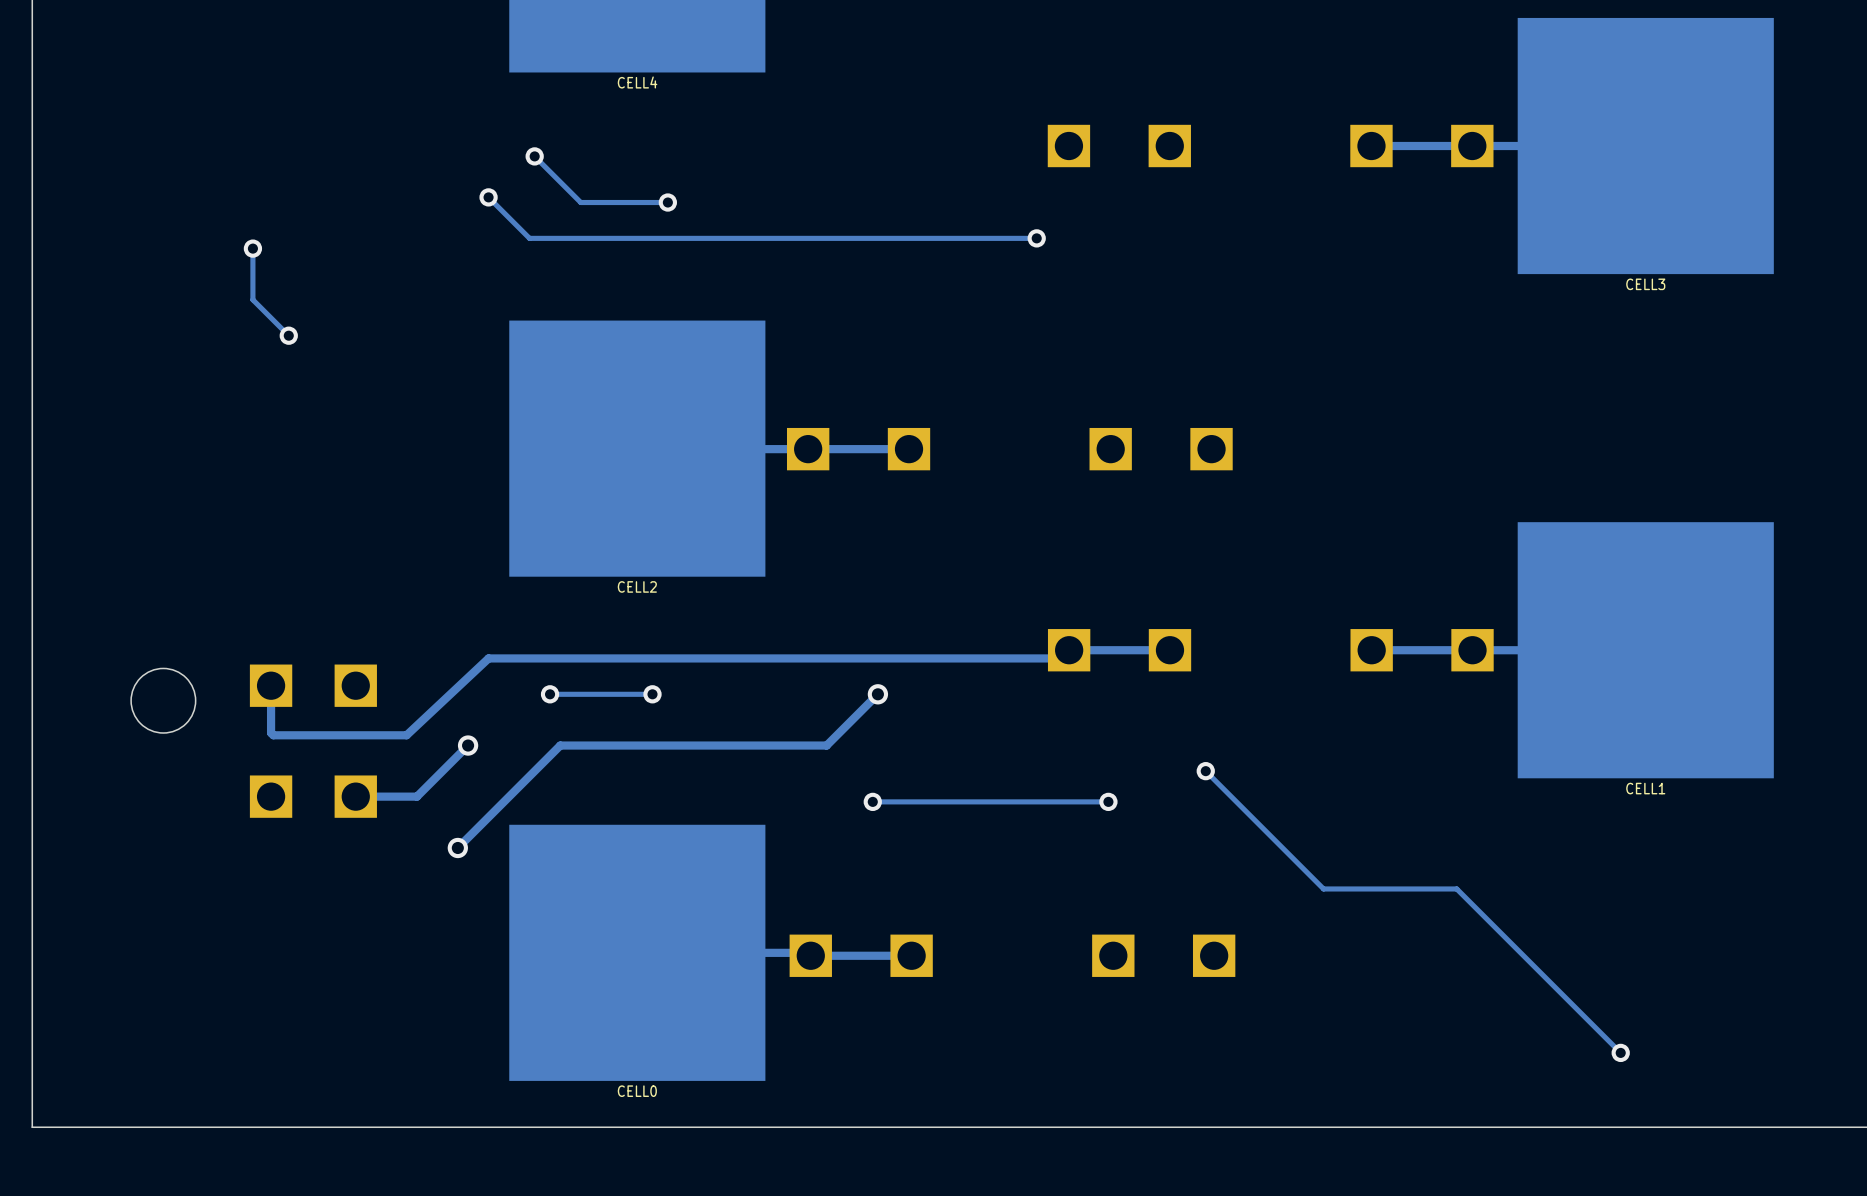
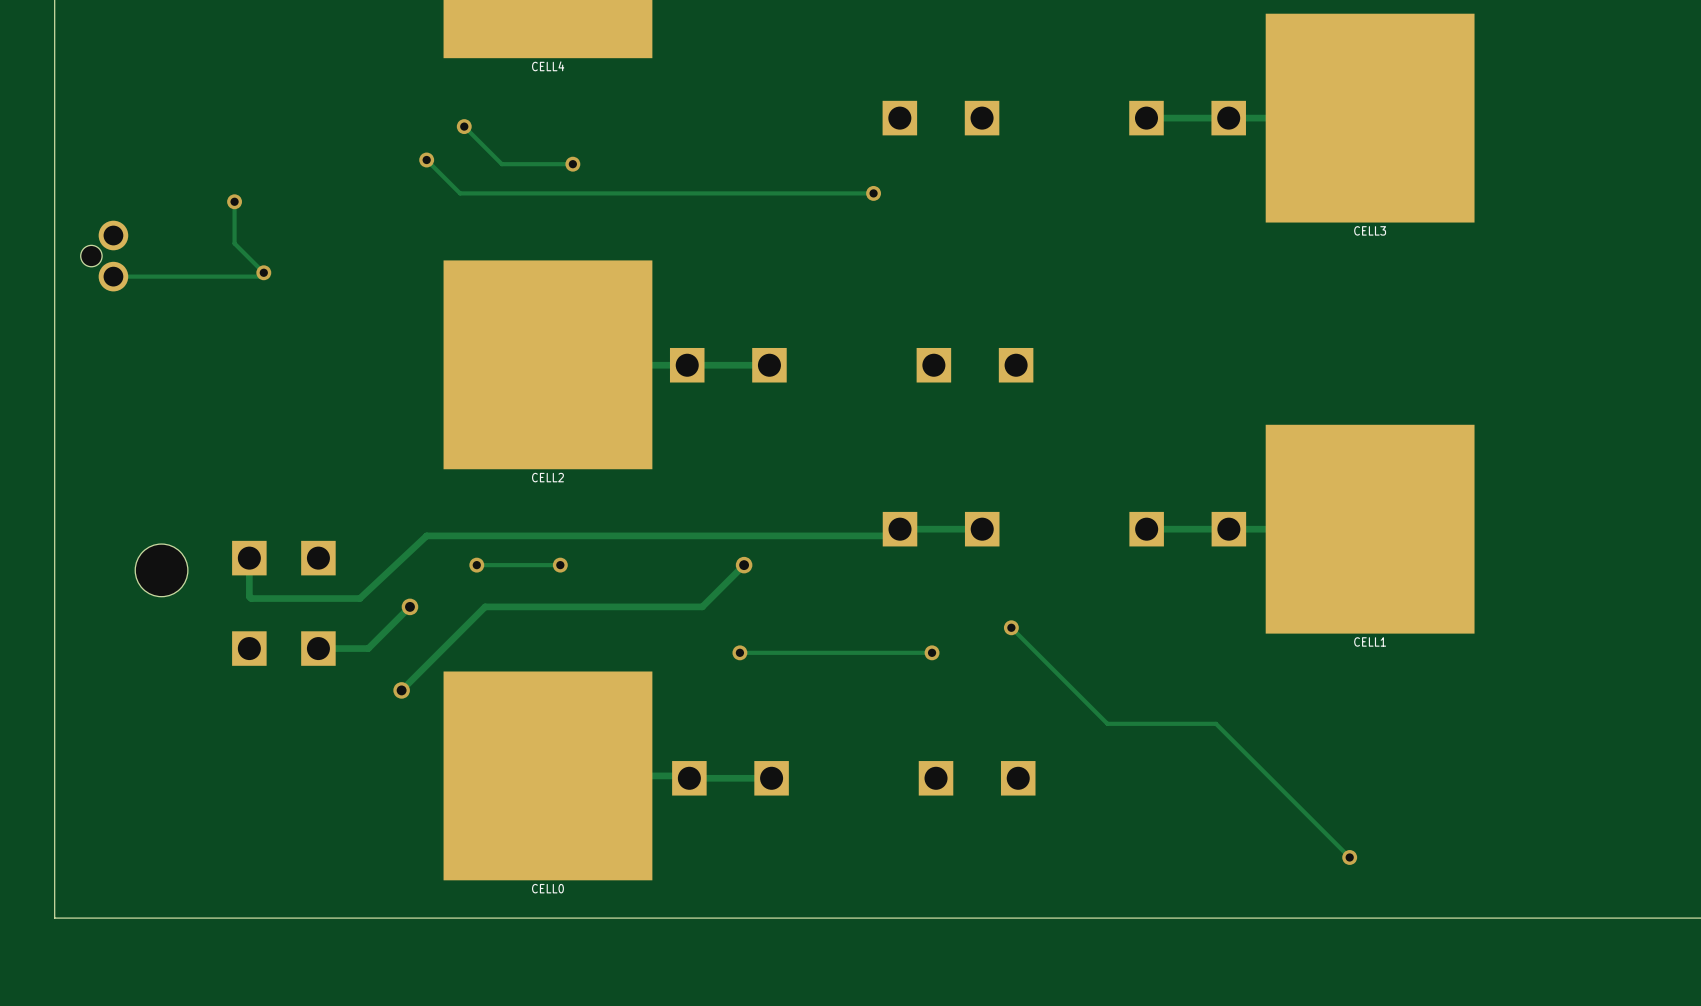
part: none -> (104, 256)
track: none -> (263, 272) (263, 276) (113, 276)

